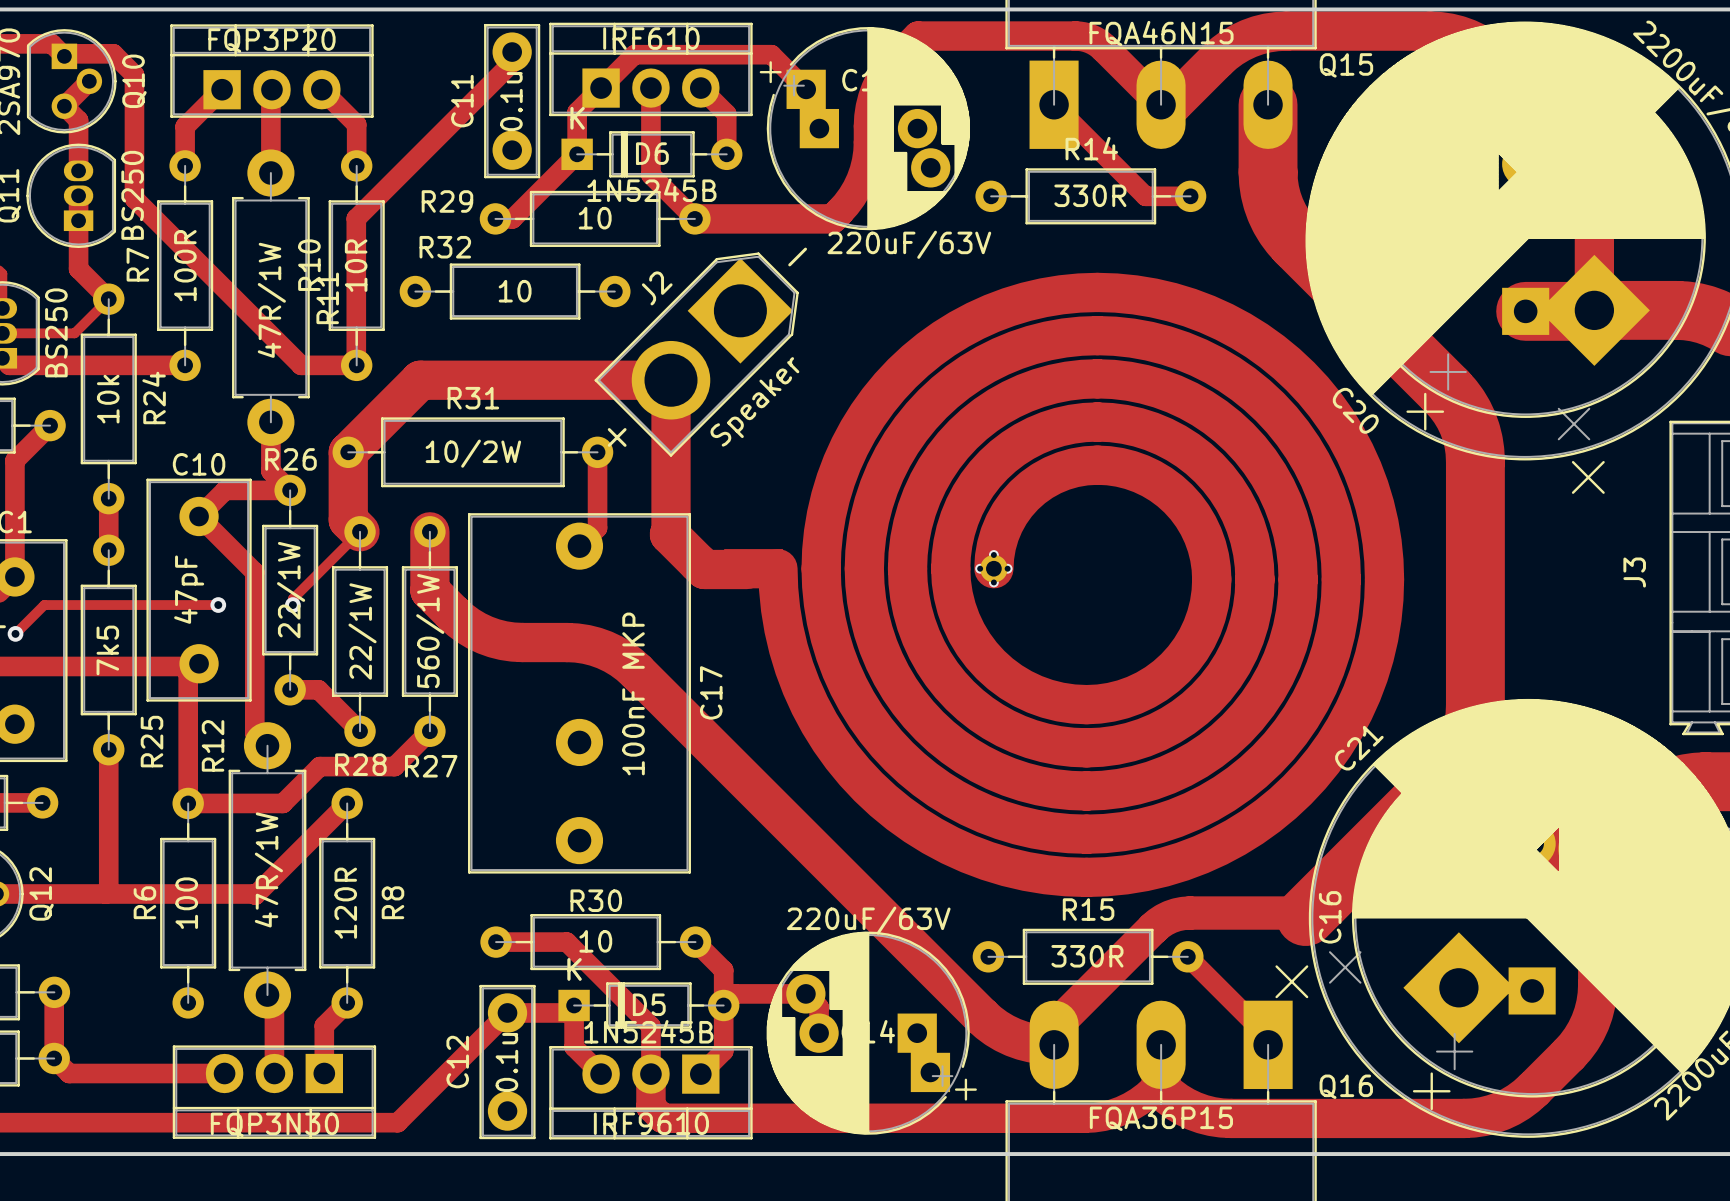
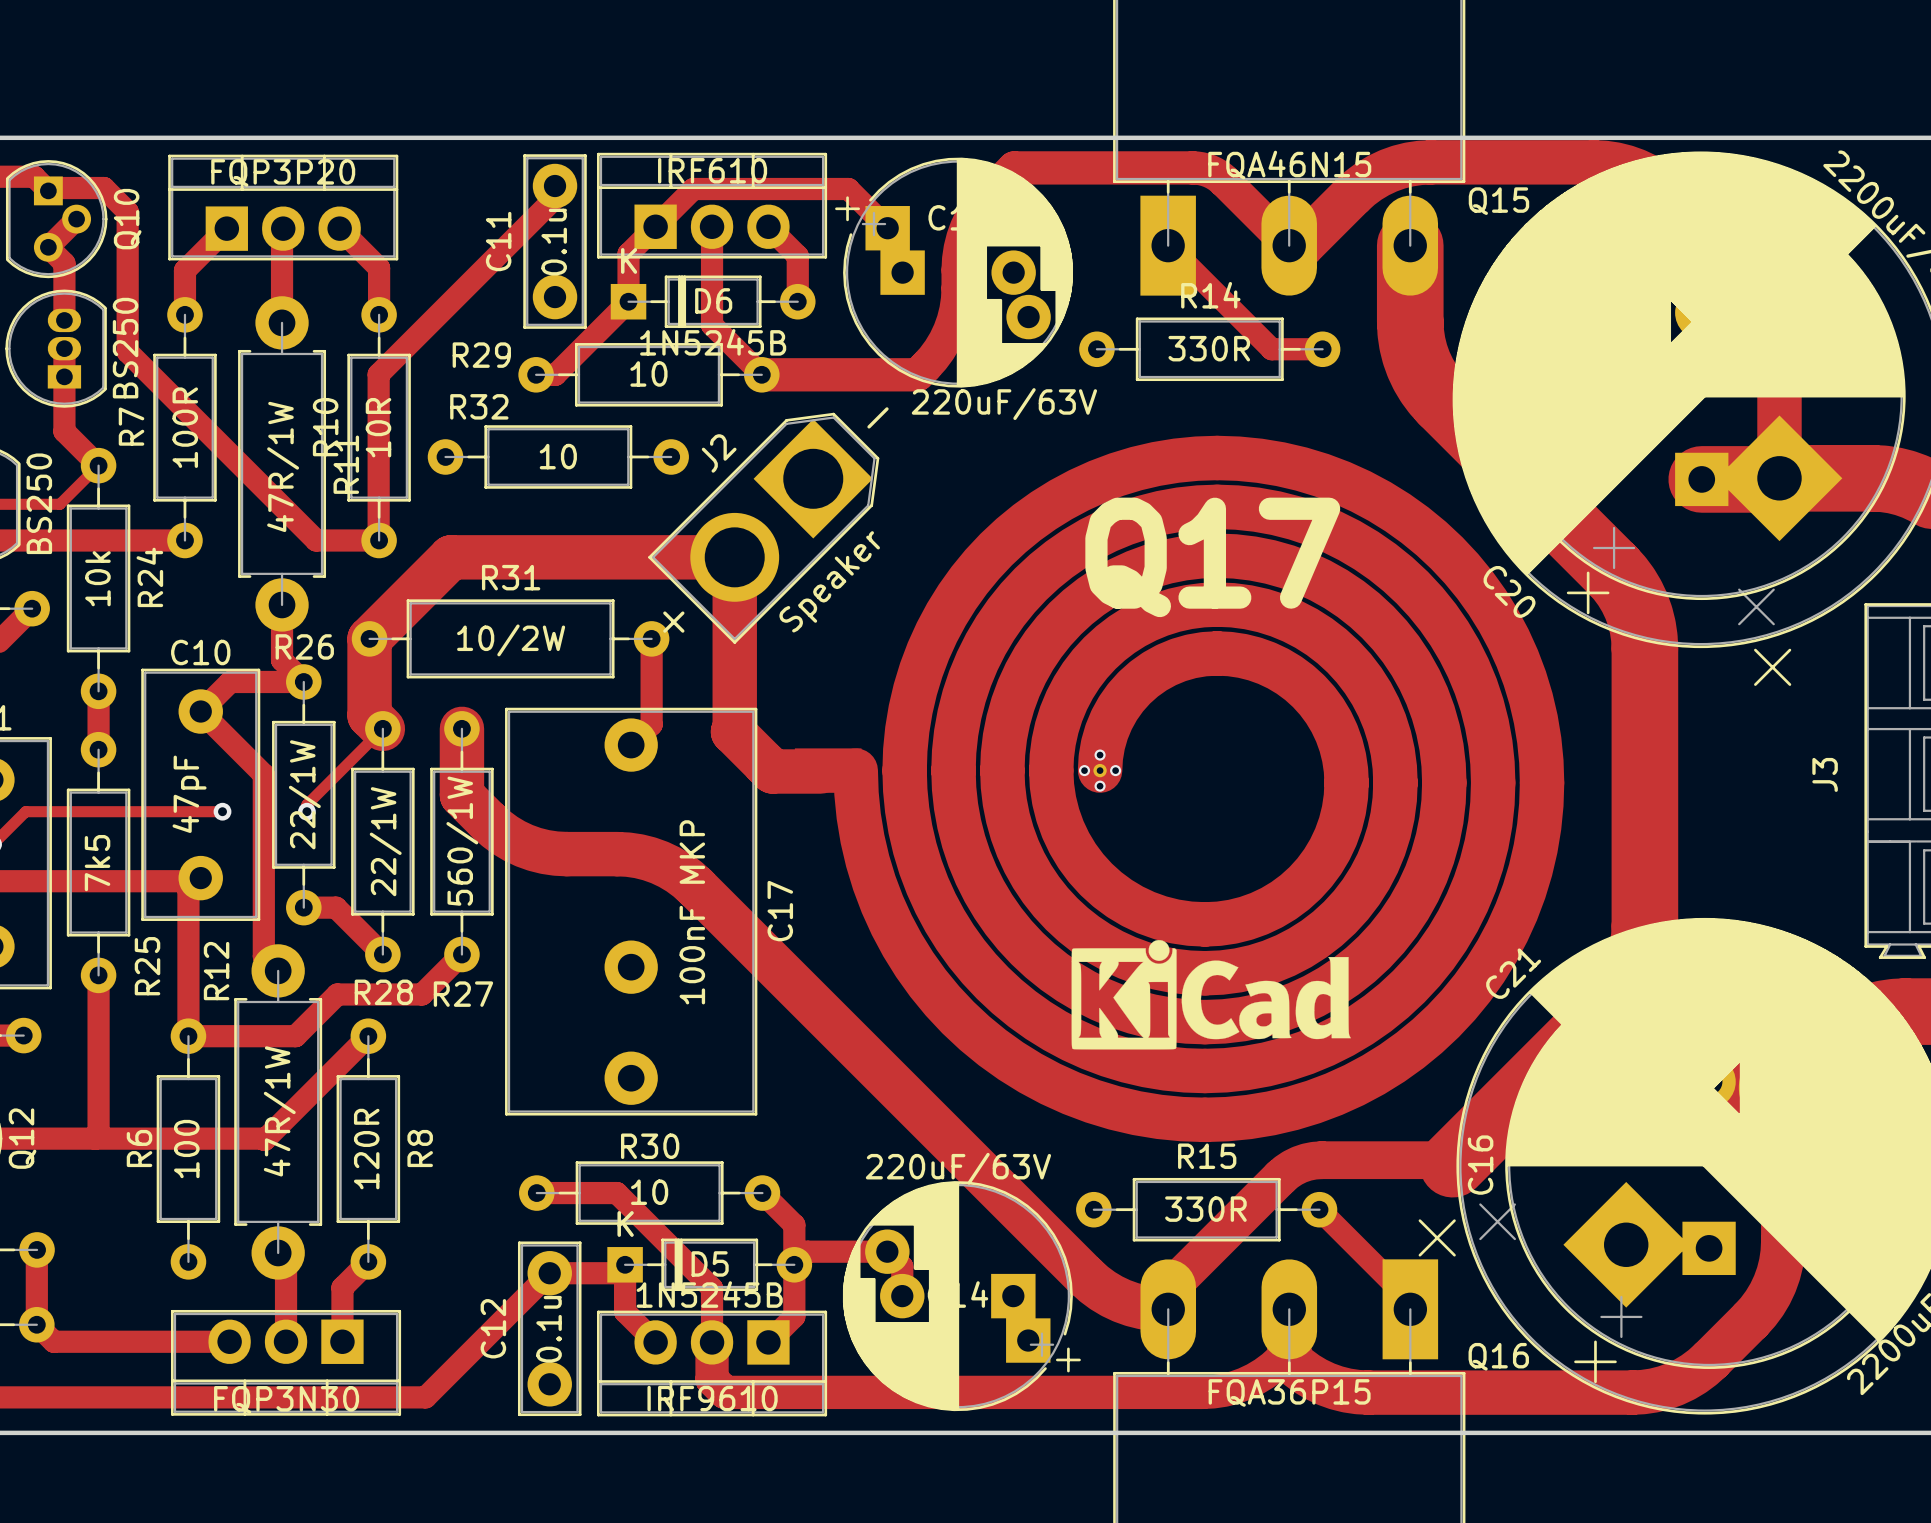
part footprint: [724, 272, 1405, 898] -> [794, 435, 1565, 1143]
text: none -> Q17 (1212, 557)
drawing: none -> [1071, 940, 1351, 1050]

